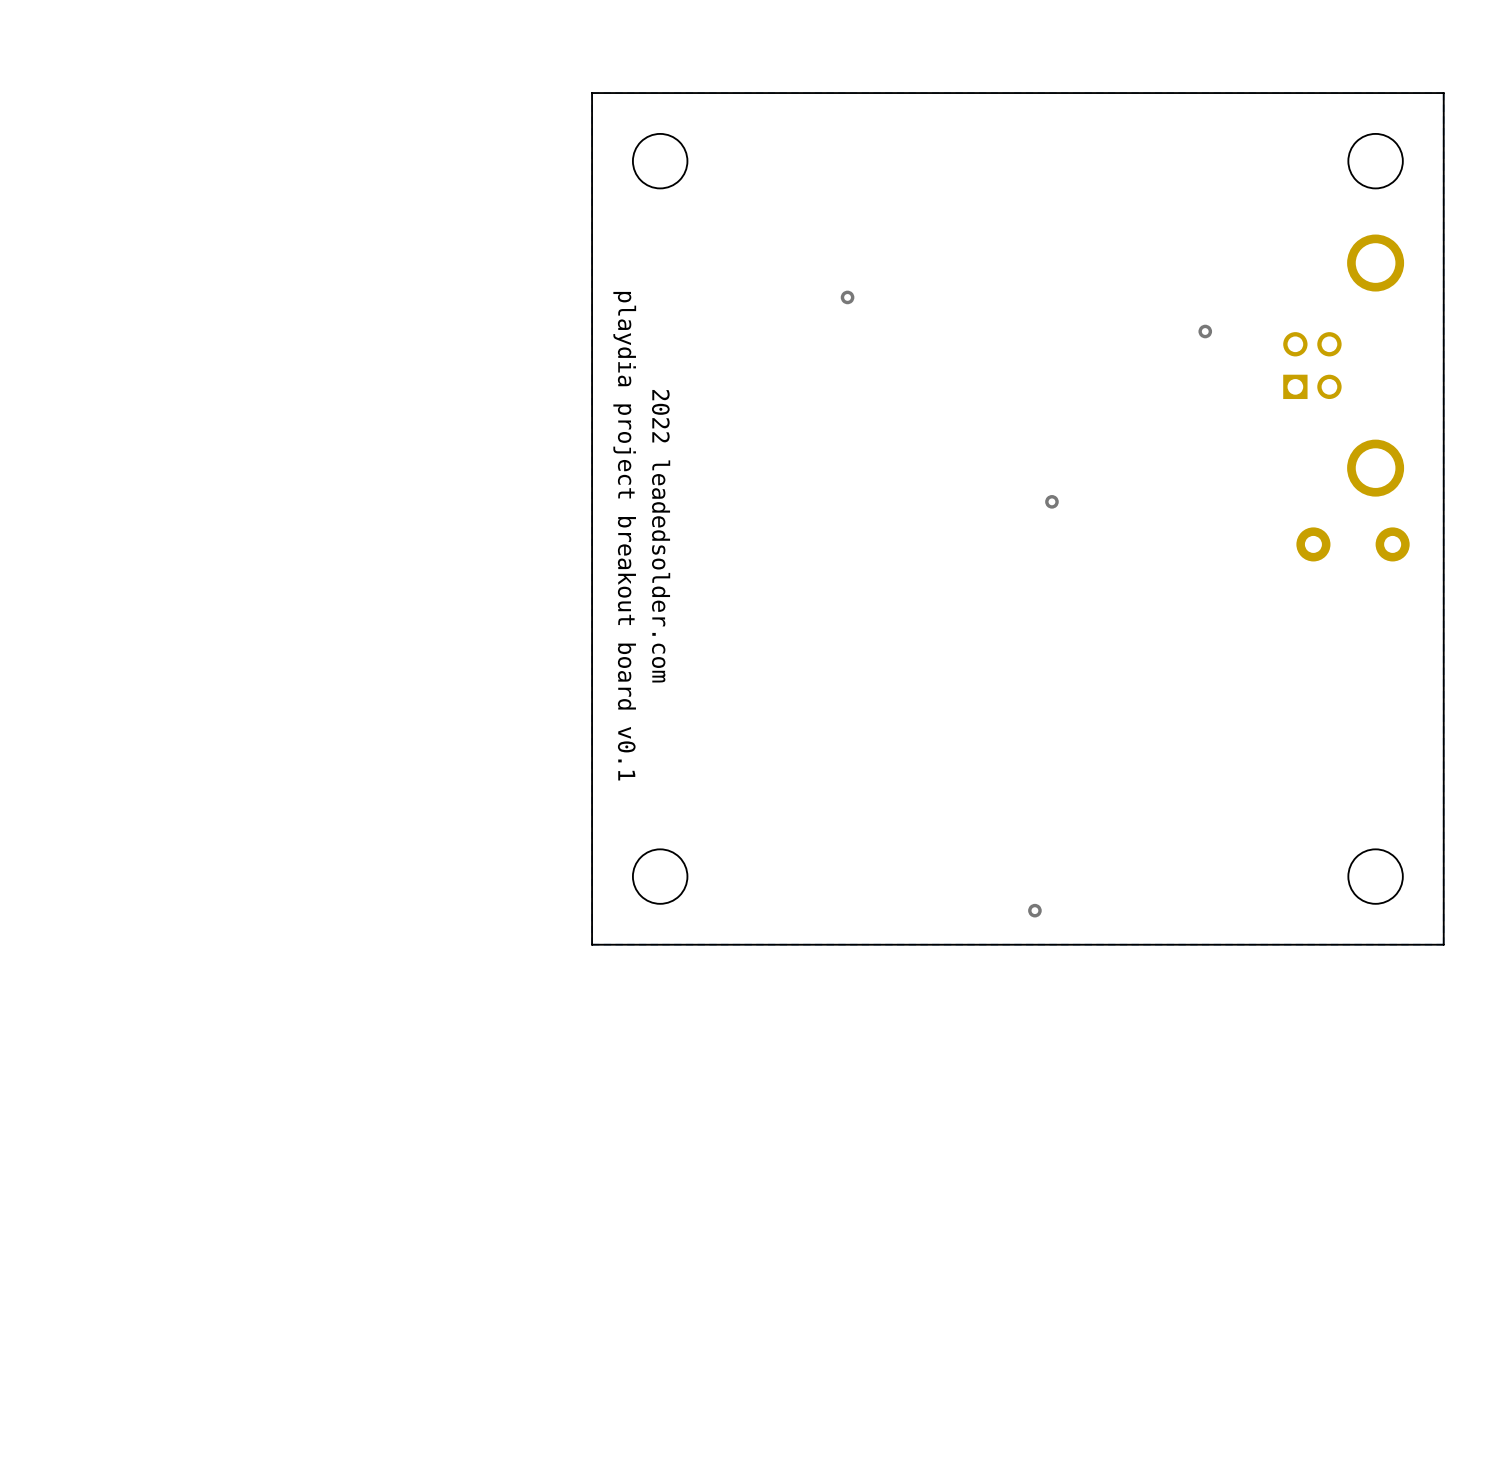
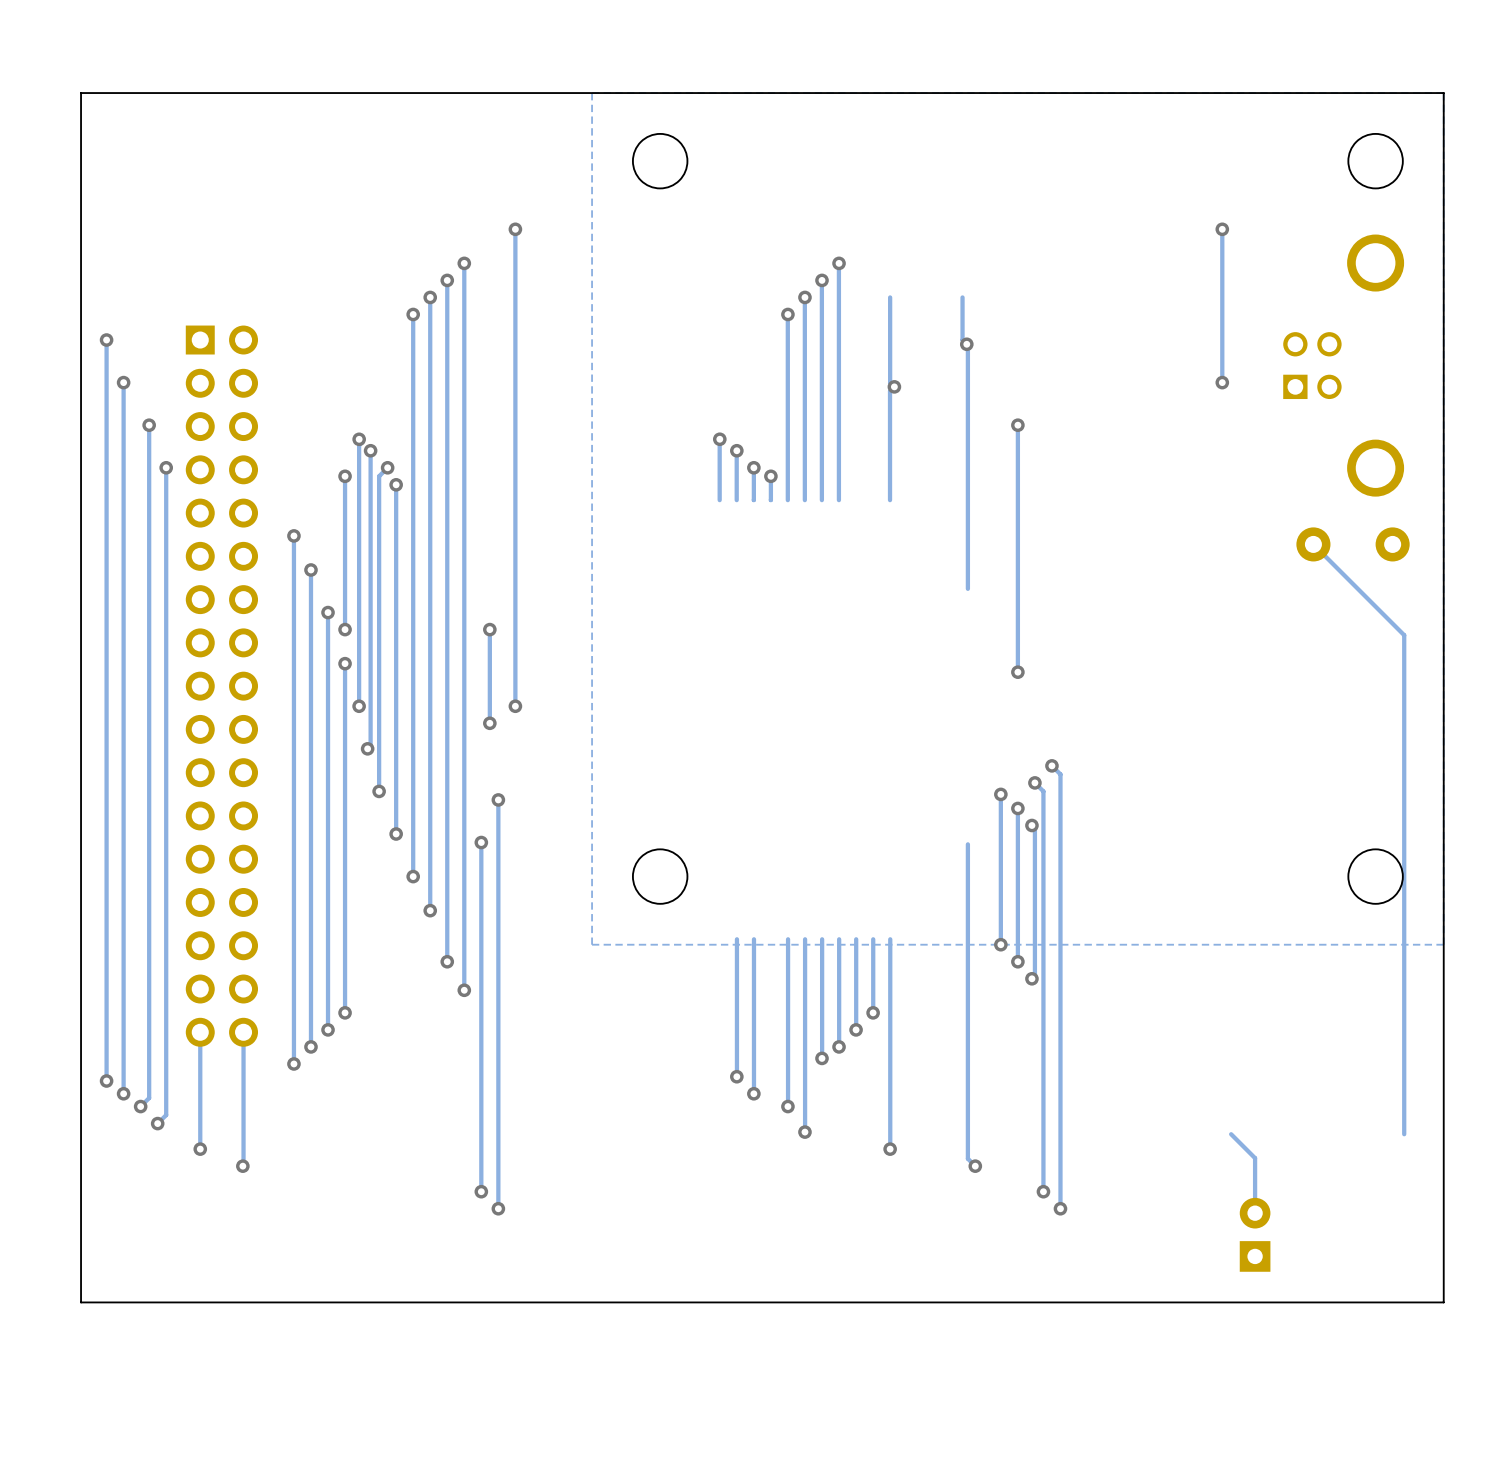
board edge: (592, 93) (592, 944) (1443, 944) -> (592, 93) (81, 93) (81, 1302) (1443, 1302) (1443, 944)
track: none -> (515, 229) (515, 706)
via: none -> (515, 229)
track: none -> (1222, 229) (1222, 382)
via: none -> (1222, 229)
track: none -> (464, 263) (464, 990)
via: none -> (464, 263)
track: none -> (838, 263) (838, 500)
via: none -> (839, 263)
track: none -> (447, 280) (447, 961)
via: none -> (447, 280)
track: none -> (821, 280) (821, 500)
via: none -> (822, 280)
track: none -> (430, 297) (430, 910)
via: none -> (430, 297)
track: none -> (804, 297) (804, 500)
via: none -> (804, 297)
via: (847, 297) -> none
track: none -> (890, 297) (890, 382) (894, 386) (890, 391) (890, 500)
track: none -> (962, 297) (962, 340) (967, 345) (967, 588)
track: none -> (413, 314) (413, 876)
via: none -> (413, 314)
track: none -> (787, 314) (787, 500)
via: none -> (787, 314)
via: (1205, 331) -> none
track: none -> (106, 340) (106, 1080)
via: none -> (106, 340)
via: none -> (966, 344)
track: none -> (123, 382) (123, 1093)
via: none -> (123, 382)
via: none -> (1222, 382)
via: none -> (894, 386)
track: none -> (149, 425) (149, 1098) (140, 1106)
via: none -> (149, 425)
track: none -> (1017, 425) (1017, 672)
track: none -> (359, 439) (362, 442) (359, 445) (359, 706)
via: none -> (359, 439)
track: none -> (719, 439) (719, 500)
via: none -> (719, 439)
track: none -> (370, 450) (370, 745) (367, 748)
via: none -> (370, 450)
track: none -> (736, 450) (736, 500)
via: none -> (736, 450)
track: none -> (166, 467) (166, 1115) (157, 1123)
via: none -> (166, 467)
track: none -> (387, 467) (379, 476) (379, 791)
via: none -> (387, 467)
track: none -> (753, 467) (753, 500)
via: none -> (753, 467)
track: none -> (345, 476) (345, 629)
via: none -> (345, 476)
track: none -> (770, 476) (770, 500)
via: none -> (770, 476)
track: none -> (396, 484) (396, 834)
via: none -> (396, 484)
via position: (1051, 501) -> (1017, 425)
track: none -> (293, 535) (293, 1063)
via: none -> (293, 535)
text: playdia project breakout board v0.1 (624, 536) -> none
text: 2022 leadedsolder.com (661, 536) -> none
track: none -> (1313, 544) (1404, 635) (1404, 1134)
track: none -> (310, 569) (310, 1046)
via: none -> (310, 569)
track: none -> (328, 612) (328, 1029)
via: none -> (328, 612)
via: none -> (345, 629)
track: none -> (489, 629) (489, 723)
via: none -> (489, 629)
track: none -> (345, 663) (345, 1012)
via: none -> (345, 663)
via: none -> (1017, 672)
part: none -> (221, 686)
via: none -> (359, 706)
via: none -> (515, 706)
via: none -> (489, 723)
via: none -> (367, 748)
track: none -> (1051, 765) (1060, 774) (1060, 1208)
via: none -> (1051, 765)
track: none -> (1034, 782) (1043, 791) (1043, 1191)
via: none -> (1034, 782)
via: none -> (379, 791)
track: none -> (1000, 794) (1000, 944)
via: none -> (1000, 794)
track: none -> (498, 799) (498, 1208)
via: none -> (498, 799)
track: none -> (1017, 808) (1017, 961)
via: none -> (1017, 808)
track: none -> (1031, 825) (1034, 828) (1034, 975) (1031, 978)
via: none -> (1031, 825)
via: none -> (396, 834)
track: none -> (481, 842) (481, 1191)
via: none -> (481, 842)
track: none -> (967, 844) (967, 1158) (975, 1166)
via: none -> (413, 876)
via: none -> (430, 910)
via: (1034, 910) -> none
track: none -> (736, 939) (736, 1076)
track: none -> (753, 939) (753, 1093)
track: none -> (788, 939) (788, 1106)
track: none -> (805, 939) (805, 1131)
track: none -> (822, 939) (822, 1058)
track: none -> (839, 939) (839, 1046)
track: none -> (856, 939) (856, 1029)
track: none -> (873, 939) (873, 1012)
track: none -> (890, 939) (890, 1149)
via: none -> (1000, 944)
via: none -> (447, 961)
via: none -> (1017, 961)
via: none -> (1031, 978)
via: none -> (464, 990)
via: none -> (345, 1012)
via: none -> (873, 1012)
via: none -> (328, 1029)
via: none -> (856, 1029)
track: none -> (200, 1032) (200, 1149)
track: none -> (243, 1032) (242, 1166)
via: none -> (310, 1046)
via: none -> (839, 1046)
via: none -> (822, 1058)
via: none -> (293, 1063)
via: none -> (736, 1076)
via: none -> (106, 1080)
via: none -> (123, 1093)
via: none -> (753, 1093)
via: none -> (140, 1106)
via: none -> (787, 1106)
via: none -> (157, 1123)
via: none -> (804, 1132)
track: none -> (1231, 1134) (1255, 1158) (1255, 1213)
via: none -> (200, 1149)
via: none -> (890, 1149)
via: none -> (242, 1166)
via: none -> (975, 1166)
via: none -> (481, 1191)
via: none -> (1043, 1191)
via: none -> (498, 1208)
via: none -> (1060, 1208)
part: none -> (1255, 1234)

